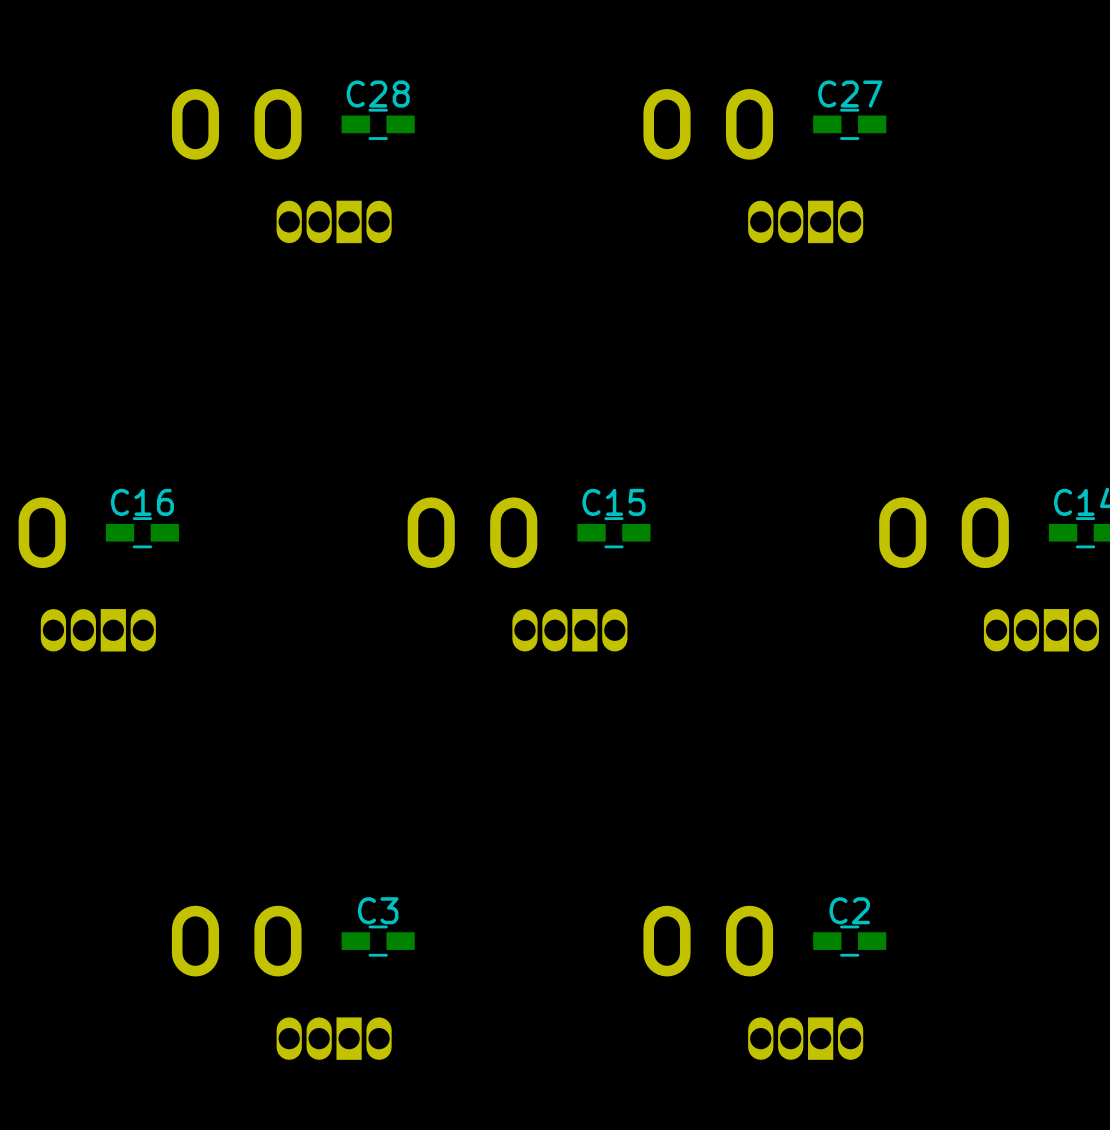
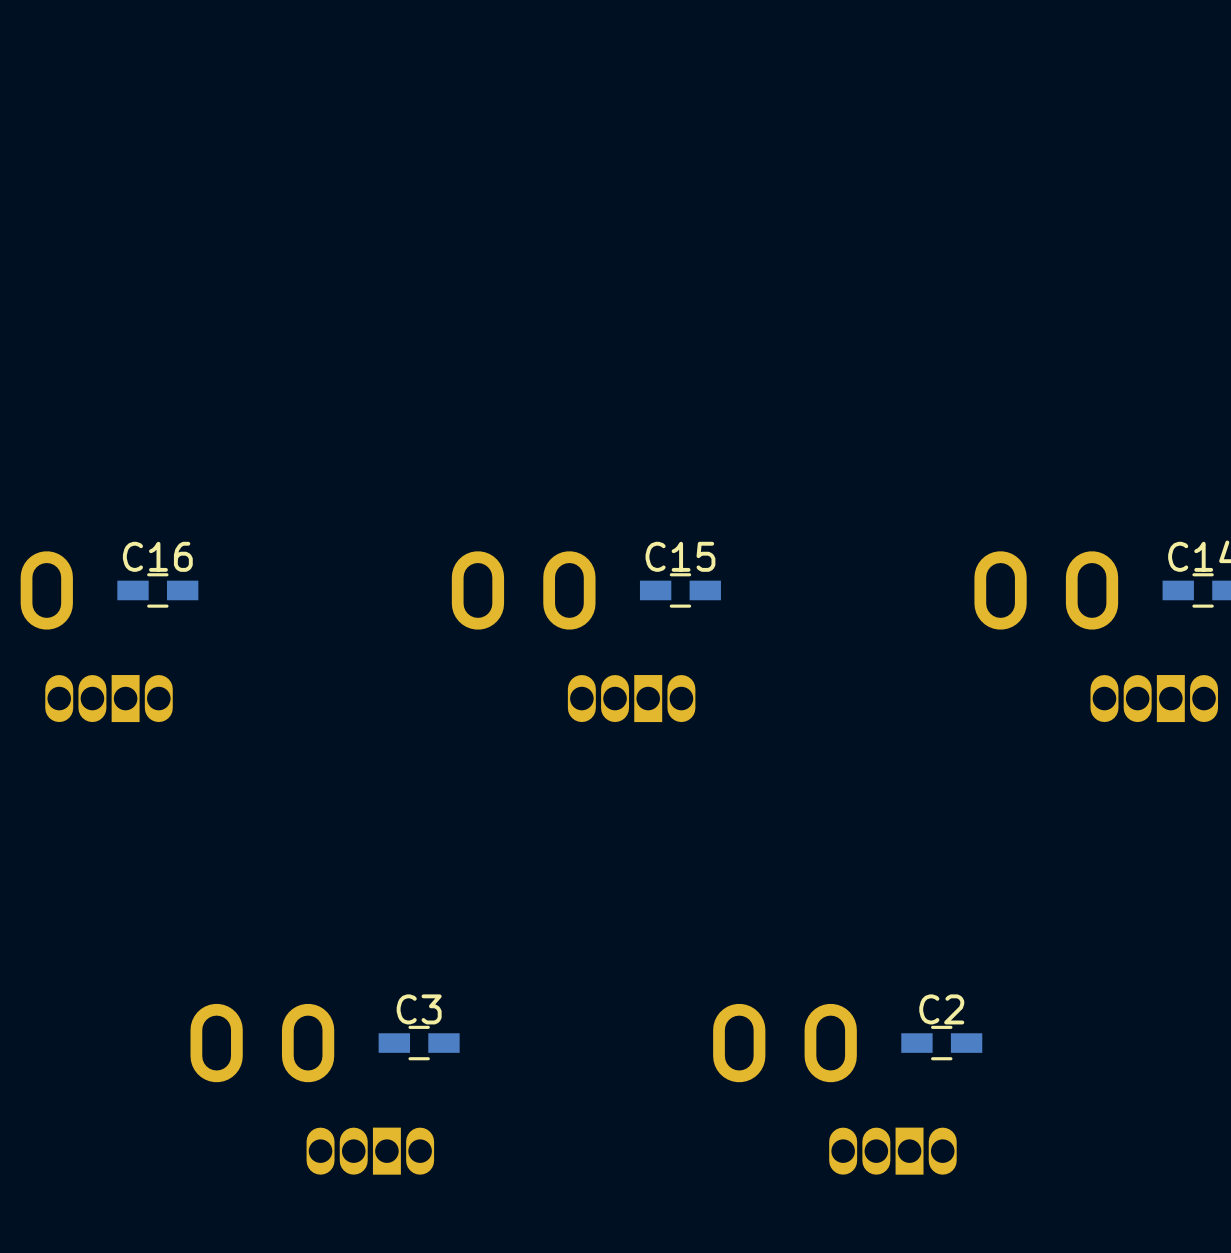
part: (236, 124) -> none
C28: (378, 124) -> none
part: (708, 124) -> none
C27: (849, 124) -> none
part: (334, 221) -> none
part: (805, 221) -> none

